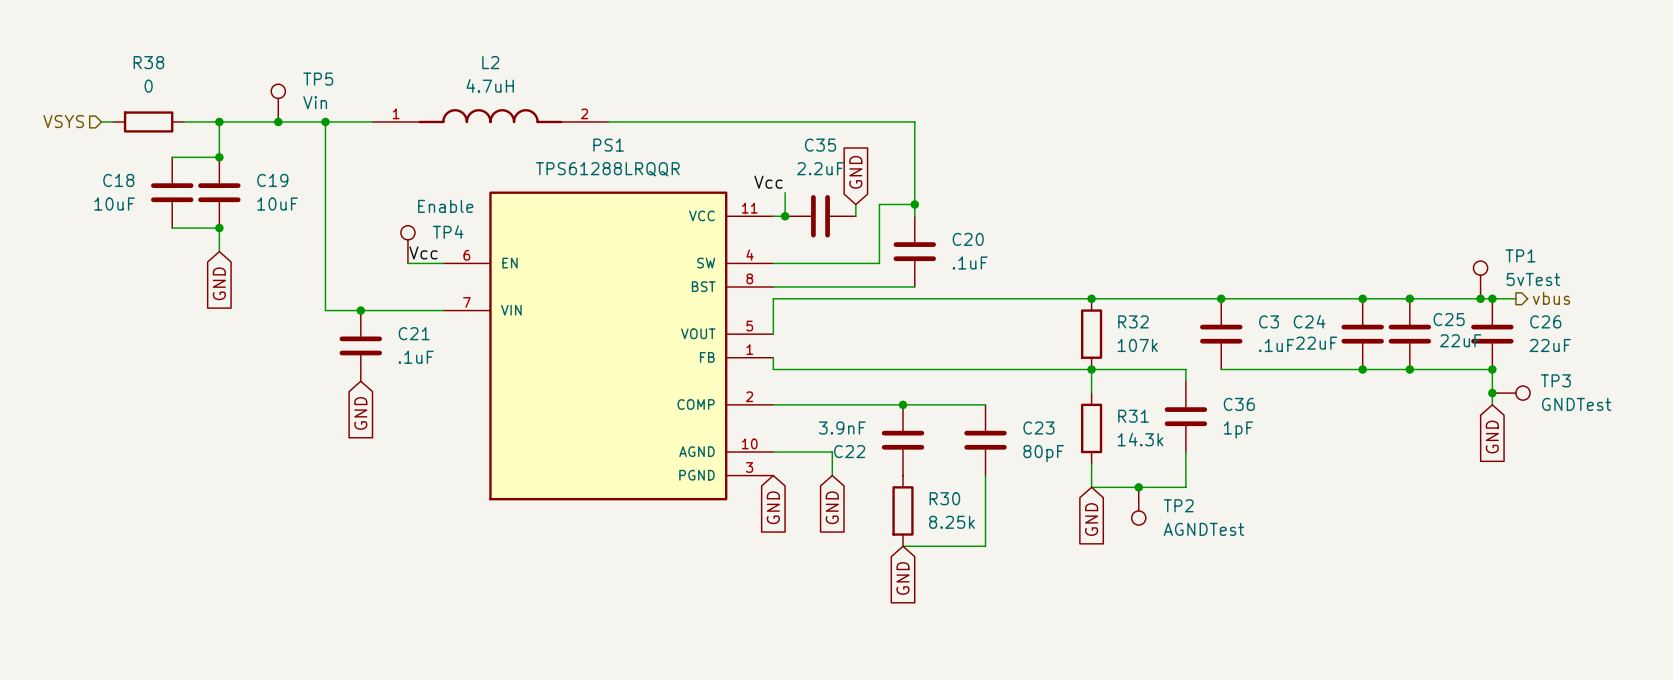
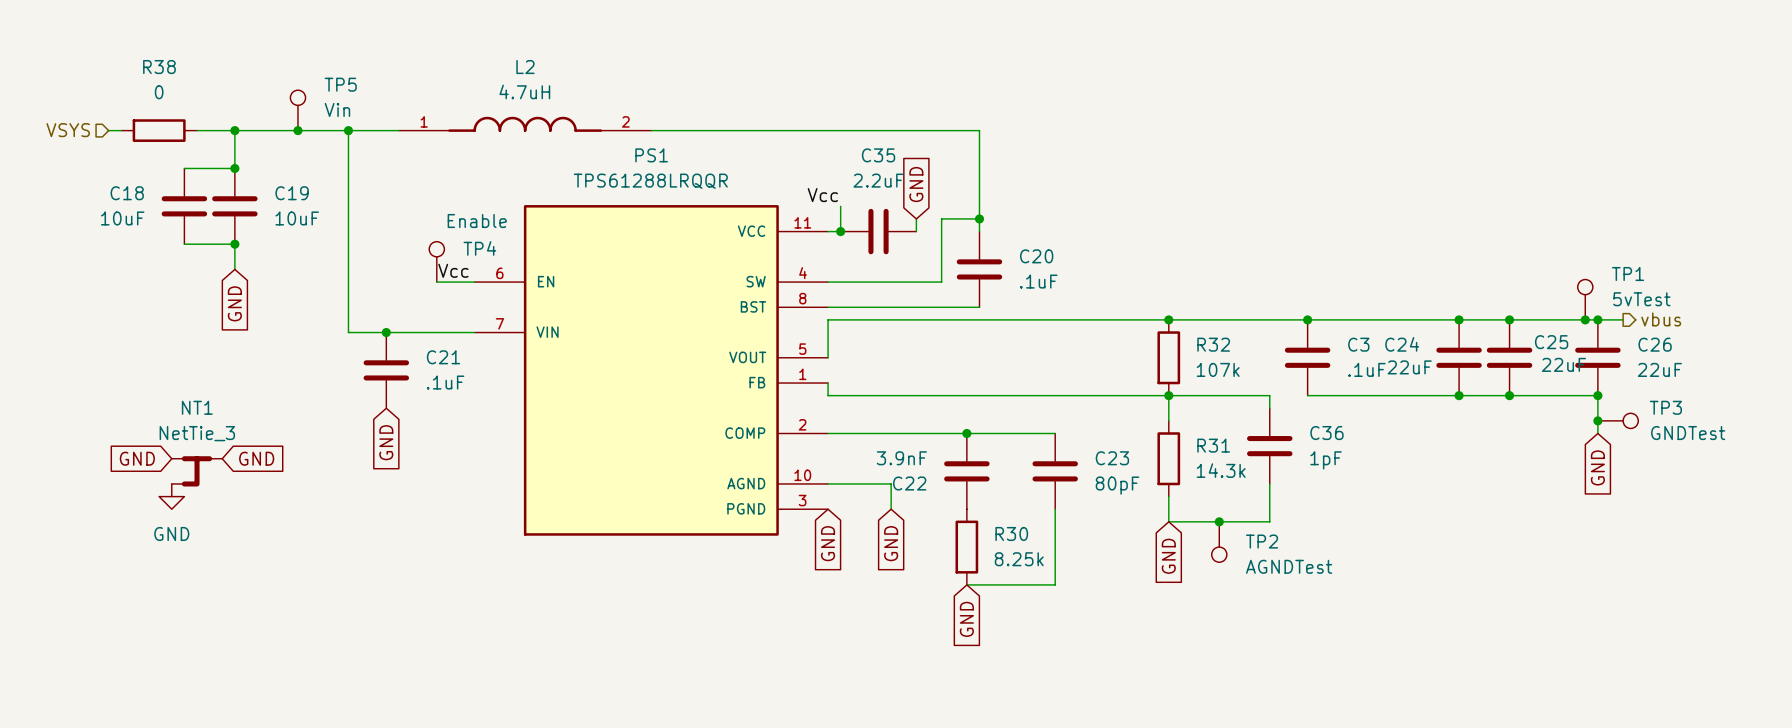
global label: none -> GND (137, 458)
global label: none -> GND (256, 458)
NT1: none -> NetTie_3 (197, 471)
power symbol: none -> GND (171, 496)

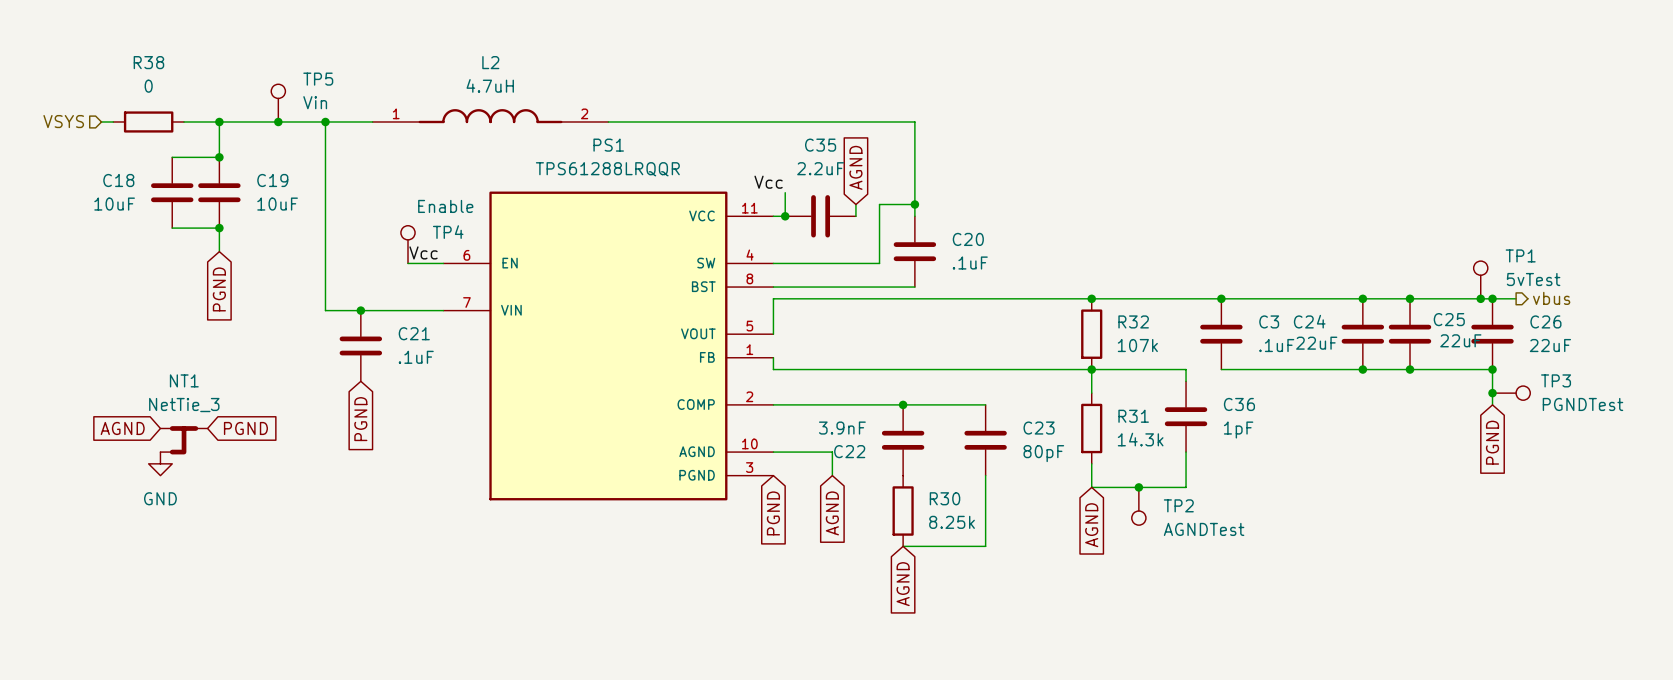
global label: GND (916, 184) -> AGND (855, 167)
global label: GND (234, 303) -> PGND (219, 289)
TP3 value: GNDTest (1688, 433) -> PGNDTest (1582, 404)
global label: GND (386, 442) -> PGND (360, 419)
global label: GND (137, 458) -> AGND (122, 428)
global label: GND (256, 458) -> PGND (245, 428)
global label: GND (1597, 467) -> PGND (1492, 442)
global label: GND (828, 543) -> PGND (773, 513)
global label: GND (891, 543) -> AGND (832, 513)
global label: GND (1168, 556) -> AGND (1091, 525)
global label: GND (966, 619) -> AGND (903, 584)

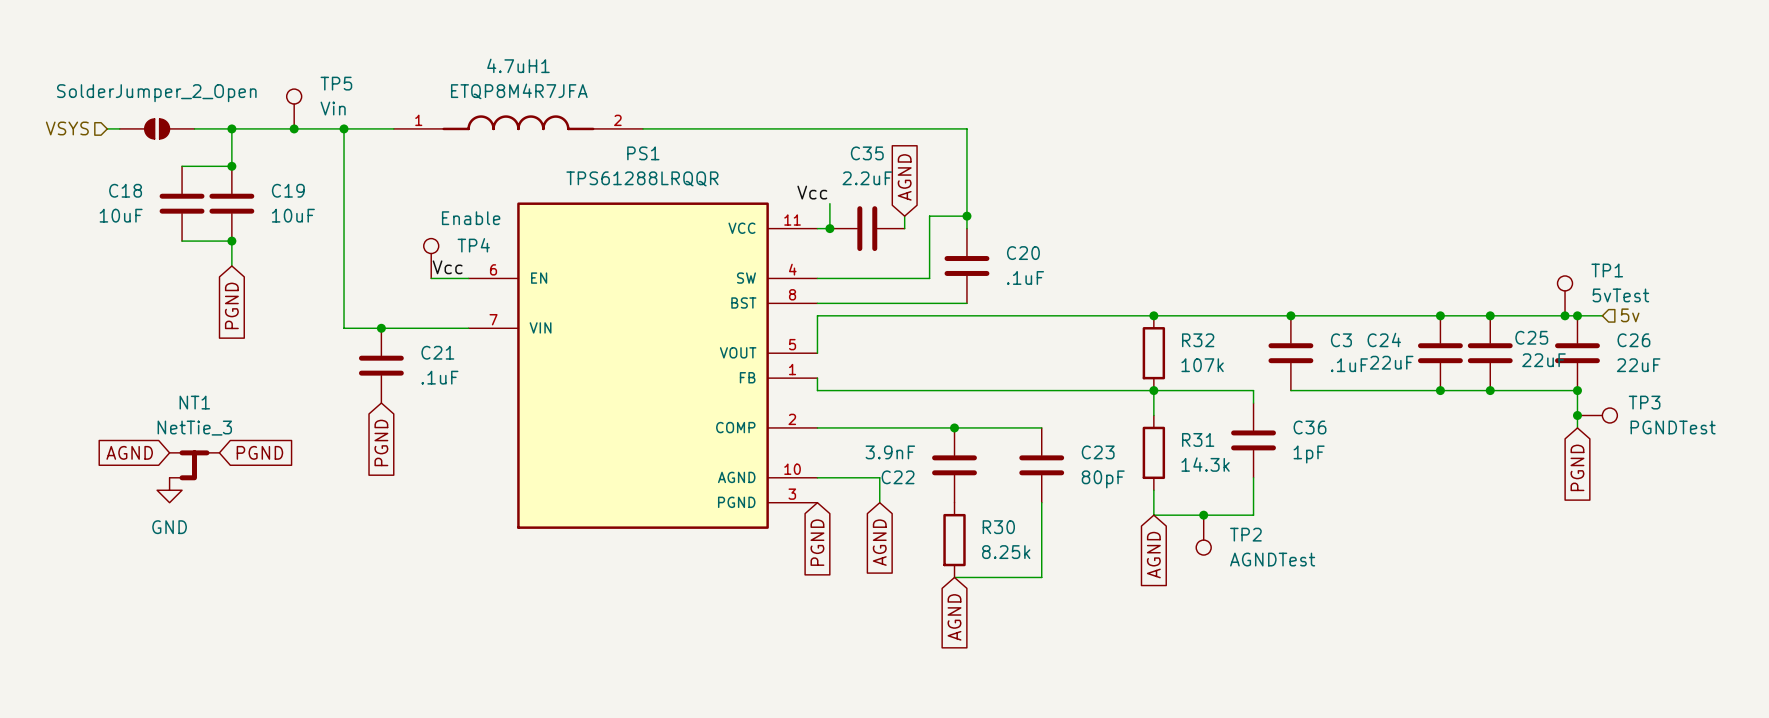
L2 name: L2 (490, 62) -> 4.7uH1 (518, 65)
L2 value: 4.7uH (490, 85) -> ETQP8M4R7JFA (519, 91)
R38: 0 (148, 121) -> none
part: none -> SolderJumper_2_Open (157, 128)
hierarchical label shape: output (1551, 298) -> input (1630, 315)
hierarchical label: vbus (1551, 298) -> 5v (1630, 315)

